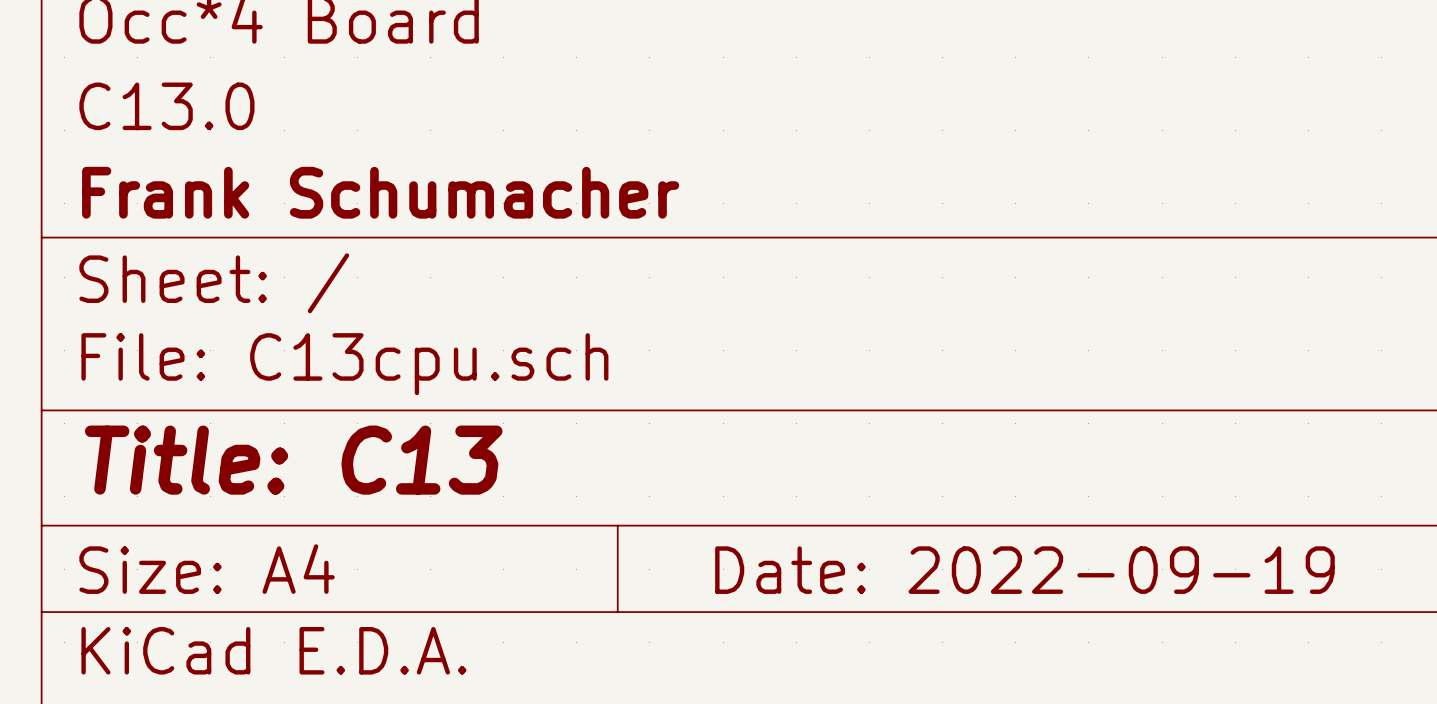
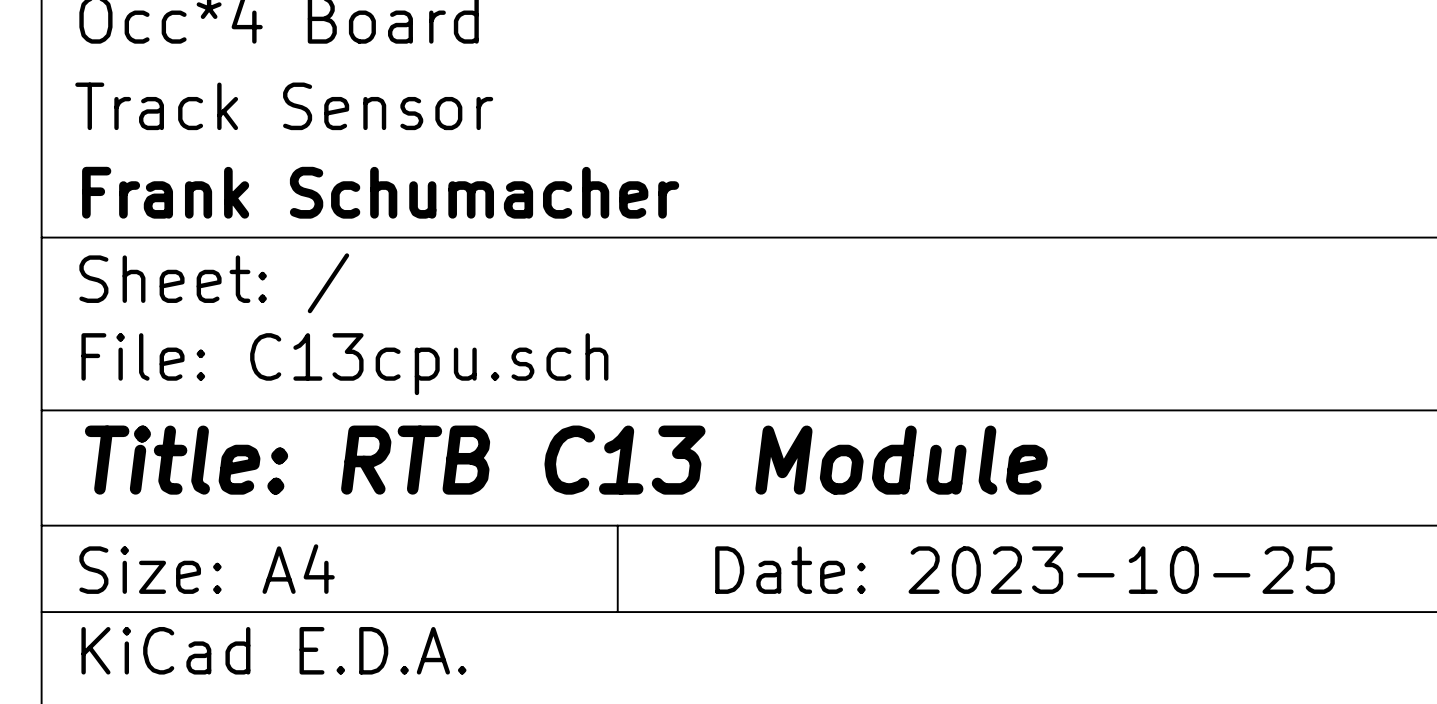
title block: C13.0 (166, 106) -> Track Sensor (284, 106)
title block: Title: C13 (293, 460) -> Title: RTB C13 Module (566, 460)
title block: Date: 2022-09-19 (1024, 570) -> Date: 2023-10-25 (1024, 570)

